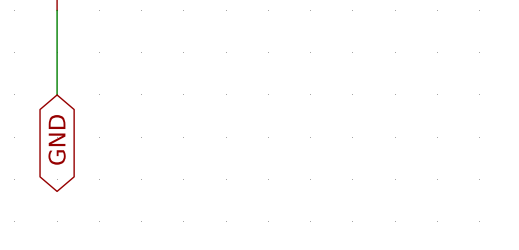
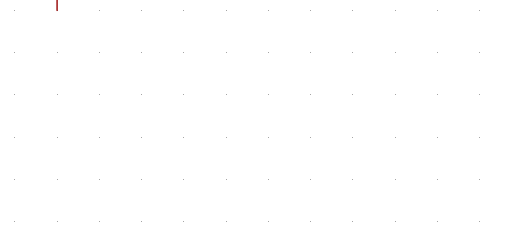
wire: (57, 10) (57, 94) -> none
global label: GND (57, 139) -> none

